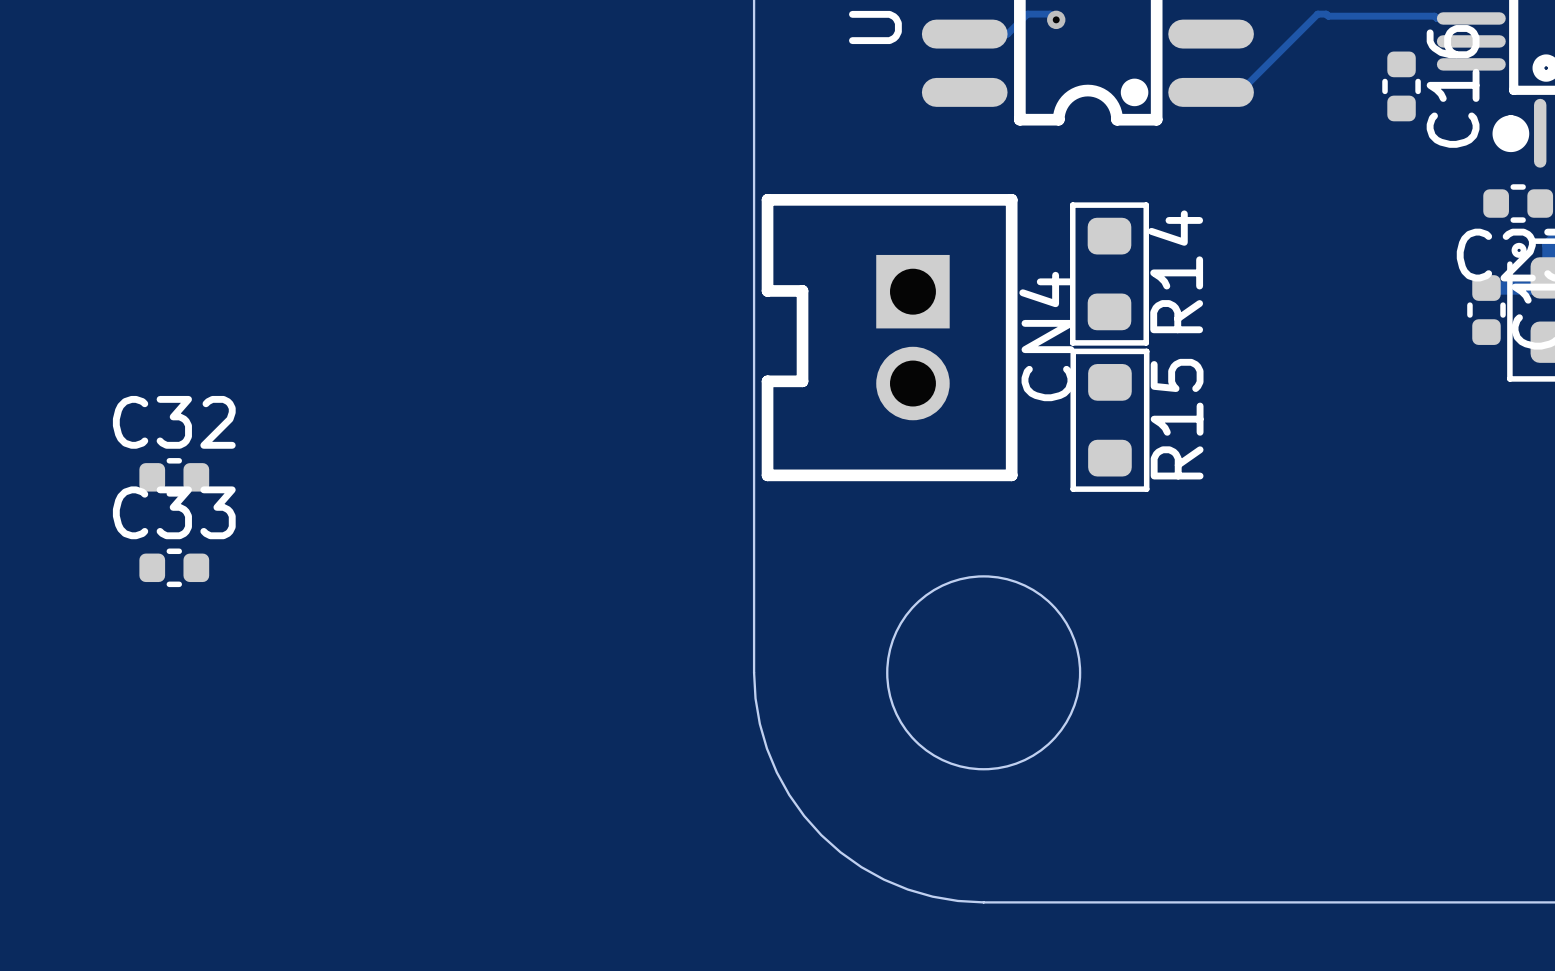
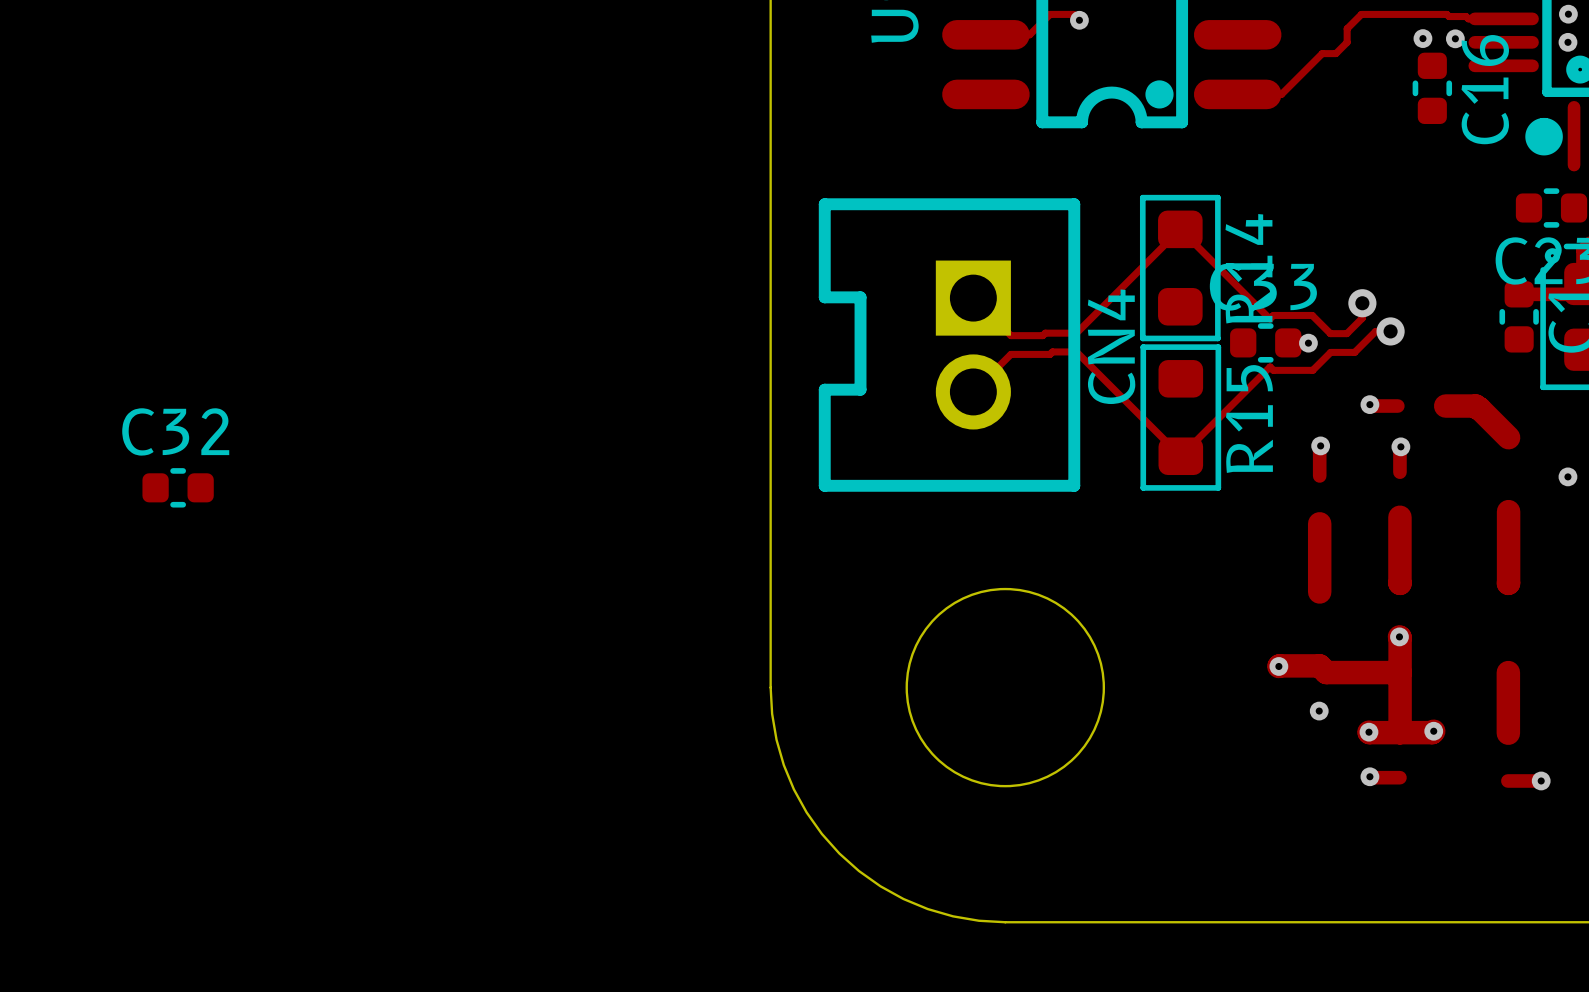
via: none -> (1568, 14)
track: (1417, 16) (1328, 16) (1326, 14) (1317, 14) (1239, 92) -> (1448, 16) (1446, 14) (1361, 14) (1347, 28) (1347, 42) (1335, 53) (1322, 53) (1281, 94) (1266, 94)
via: none -> (1422, 38)
via: none -> (1455, 38)
via: none -> (1567, 42)
R14 position: (1109, 274) -> (1180, 268)
track: none -> (973, 298) (1010, 335) (1076, 333) (1180, 229) (1269, 318) (1273, 315) (1312, 315) (1330, 333) (1346, 333) (1362, 318) (1362, 303)
via: none -> (1362, 303)
track: none -> (1390, 331) (1375, 331) (1354, 352) (1330, 352) (1312, 370) (1273, 370) (1270, 366) (1180, 456) (1076, 351) (1010, 354) (973, 391)
via: none -> (1390, 331)
via: none -> (1308, 343)
CN4 position: (889, 337) -> (949, 345)
track: none -> (1369, 404) (1397, 406)
via: none -> (1369, 404)
track: none -> (1445, 406) (1475, 406) (1508, 437)
R15 position: (1109, 420) -> (1180, 417)
track: none -> (1320, 445) (1319, 475)
via: none -> (1320, 445)
track: none -> (1400, 446) (1399, 472)
via: none -> (1400, 446)
via: none -> (1567, 476)
track: none -> (1508, 511) (1508, 583)
track: none -> (1399, 517) (1399, 583)
track: none -> (1319, 523) (1319, 591)
C33 position: (174, 567) -> (1265, 342)
track: none -> (1400, 637) (1400, 732)
via: none -> (1399, 636)
track: none -> (1279, 665) (1319, 665) (1326, 672) (1400, 672)
via: none -> (1278, 666)
track: none -> (1508, 672) (1508, 733)
via: none -> (1319, 711)
track: none -> (1433, 731) (1369, 732)
via: none -> (1433, 731)
via: none -> (1368, 732)
track: none -> (1369, 776) (1399, 777)
via: none -> (1369, 776)
track: none -> (1507, 780) (1541, 780)
via: none -> (1541, 780)

